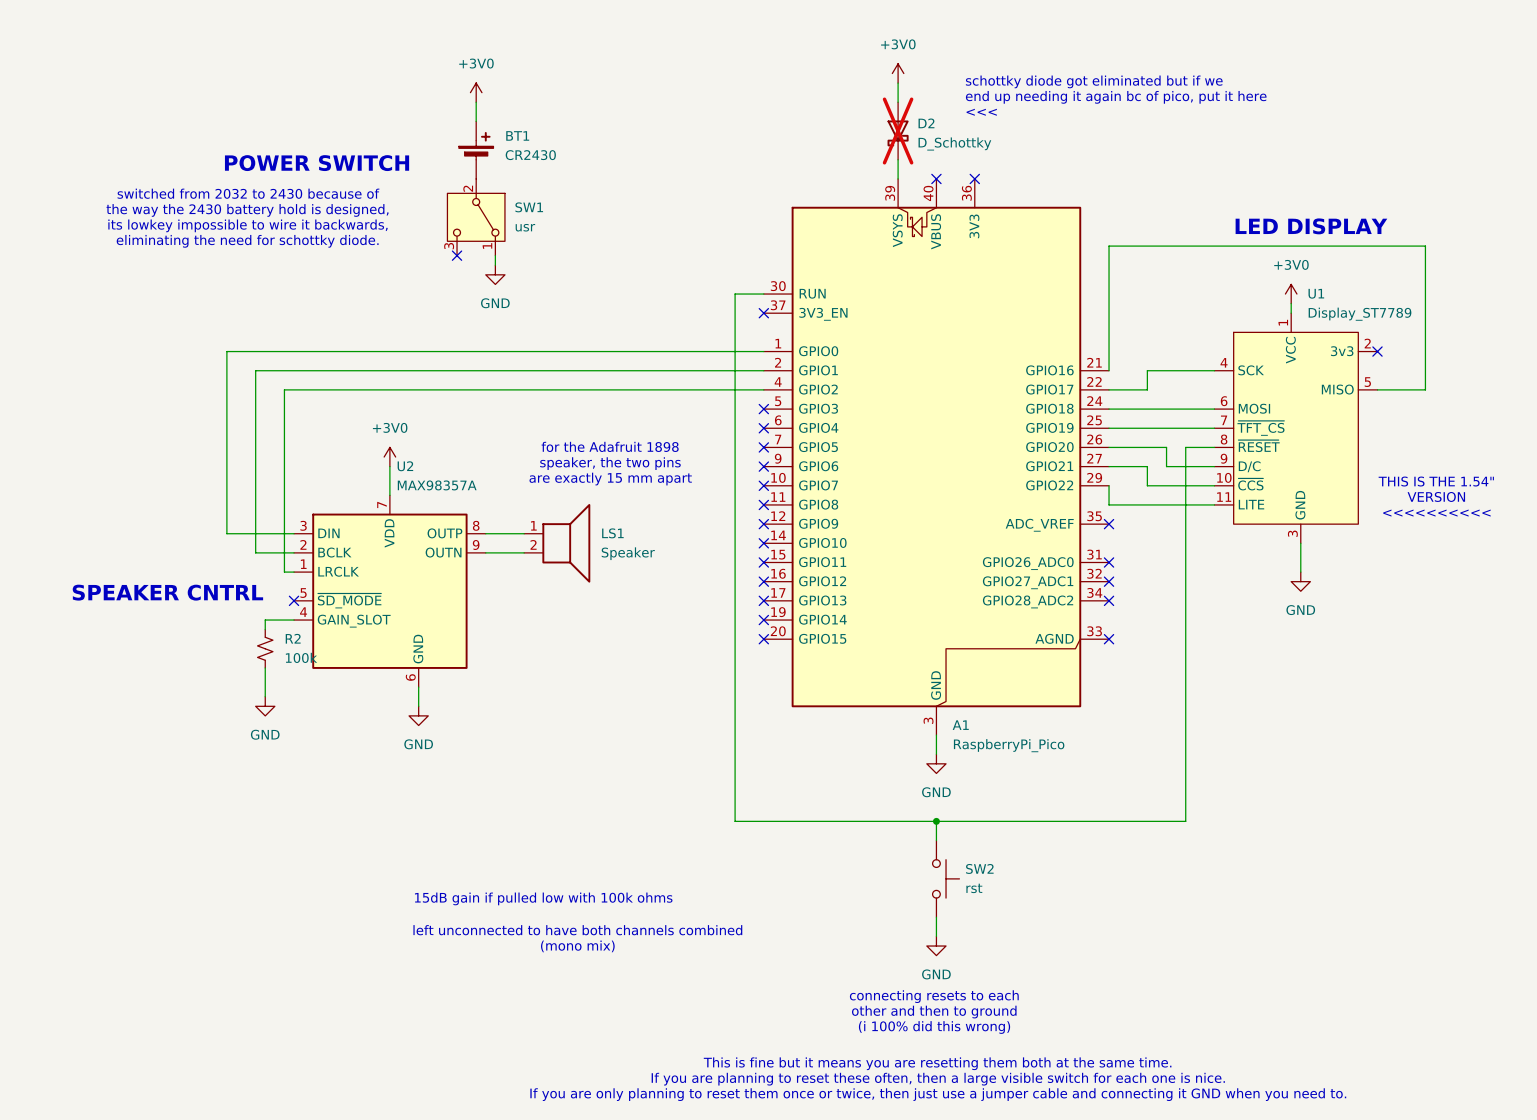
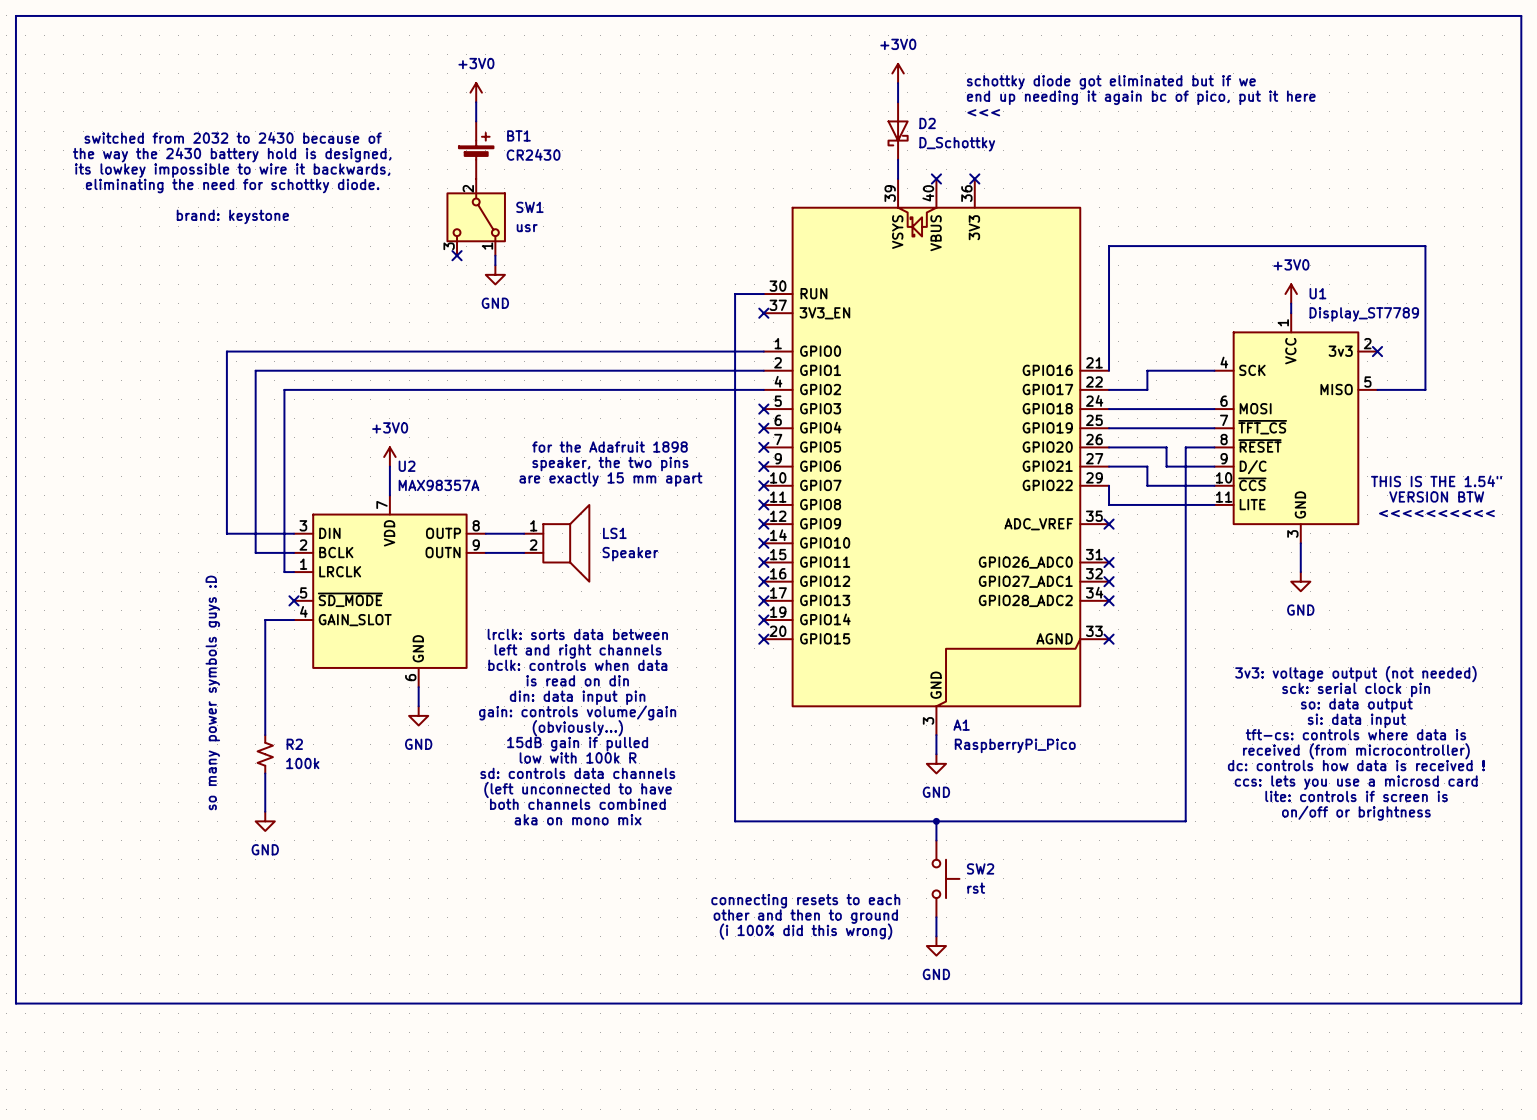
line: none -> (15, 15) (1521, 15) (1521, 1003) (15, 1003) (15, 15)
D2 do-not-place cross: (898, 131) -> none
text: POWER SWITCH (317, 163) -> none
text position: switched from 2032 to 2430 because of (248, 193) -> switched from 2032 to 2430 because of (233, 137)
text position: the way the 2430 battery hold is designed, (247, 210) -> the way the 2430 battery hold is designed, (232, 154)
text: none -> brand: keystone (232, 216)
text position: its lowkey impossible to wire it backwards, (247, 225) -> its lowkey impossible to wire it backwards, (232, 170)
text: LED DISPLAY (1311, 226) -> none
text position: eliminating the need for schottky diode. (247, 241) -> eliminating the need for schottky diode. (232, 186)
text: VERSION (1436, 496) -> VERSION BTW (1436, 496)
text: SPEAKER CNTRL (167, 592) -> none
text: none -> lrclk: sorts data between (577, 634)
R2 position: (265, 648) -> (265, 754)
text: none -> left and right channels (578, 651)
text: none -> bclk: controls when data (577, 665)
text: none -> 3v3: voltage output (not needed) (1355, 674)
text: none -> is read on din (577, 680)
text: none -> sck: serial clock pin (1356, 689)
text: none -> so many power symbols guys :D (212, 692)
wire: none -> (265, 696) (265, 735)
text: none -> din: data input pin (577, 697)
text: none -> so: data output (1356, 705)
power symbol position: GND (265, 706) -> GND (265, 821)
text: none -> gain: controls volume/gain (577, 713)
text: none -> si: data input (1356, 720)
text: none -> (obviously...) (577, 728)
text: none -> tft-cs: controls where data is (1355, 734)
text: none -> 15dB gain if pulled (577, 744)
text: none -> received (from microcontroller) (1356, 751)
text: none -> low with 100k R (578, 757)
text: none -> dc: controls how data is received ! (1356, 765)
wire: none -> (265, 773) (265, 811)
text: none -> sd: controls data channels (577, 773)
text: none -> ccs: lets you use a microsd card (1356, 782)
text: none -> (left unconnected to have (578, 789)
text: none -> lite: controls if screen is (1356, 796)
text: none -> both channels combined (577, 804)
text: none -> on/off or brightness (1356, 813)
text: none -> aka on mono mix (578, 819)
text: 15dB gain if pulled low with 100k ohms (543, 898) -> none
text: left unconnected to have both channels combined (577, 930) -> none
text: (mono mix) (577, 946) -> none
text position: connecting resets to each (934, 996) -> connecting resets to each (805, 901)
text position: other and then to ground (934, 1012) -> other and then to ground (805, 916)
text position: (i 100% did this wrong) (934, 1027) -> (i 100% did this wrong) (806, 931)
text: This is fine but it means you are resetting them both at the same time. (937, 1063) -> none
text: If you are planning to reset these often, then a large visible switch for each one is nice. (938, 1079) -> none
text: If you are only planning to reset them once or twice, then just use a jumper cable and connecting it GND when you need to. (938, 1094) -> none

